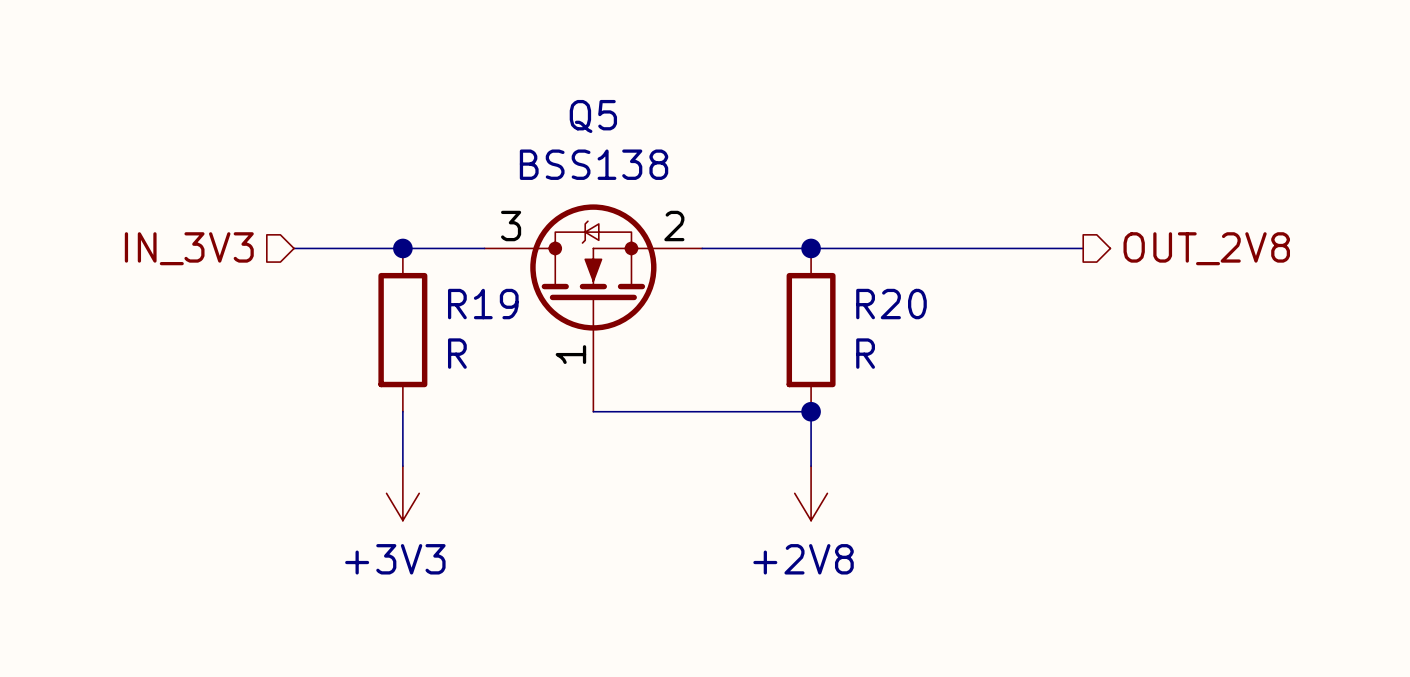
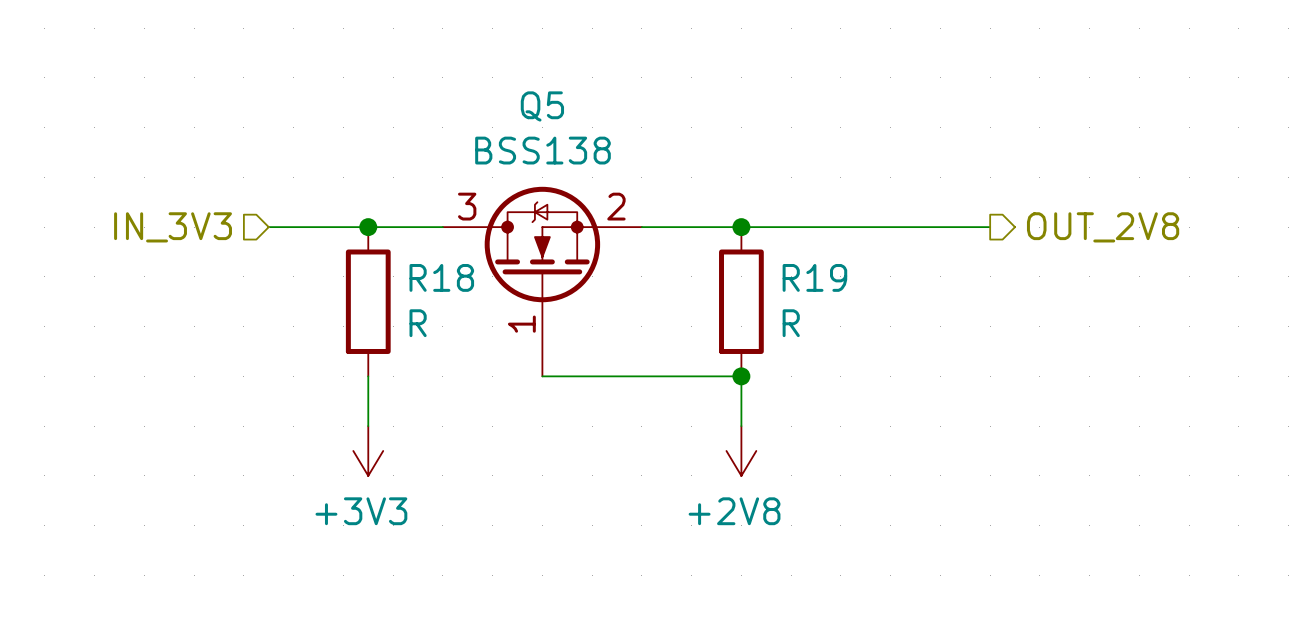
R19 name: R19 (483, 304) -> R18 (441, 277)
R20 name: R20 (891, 304) -> R19 (814, 277)

